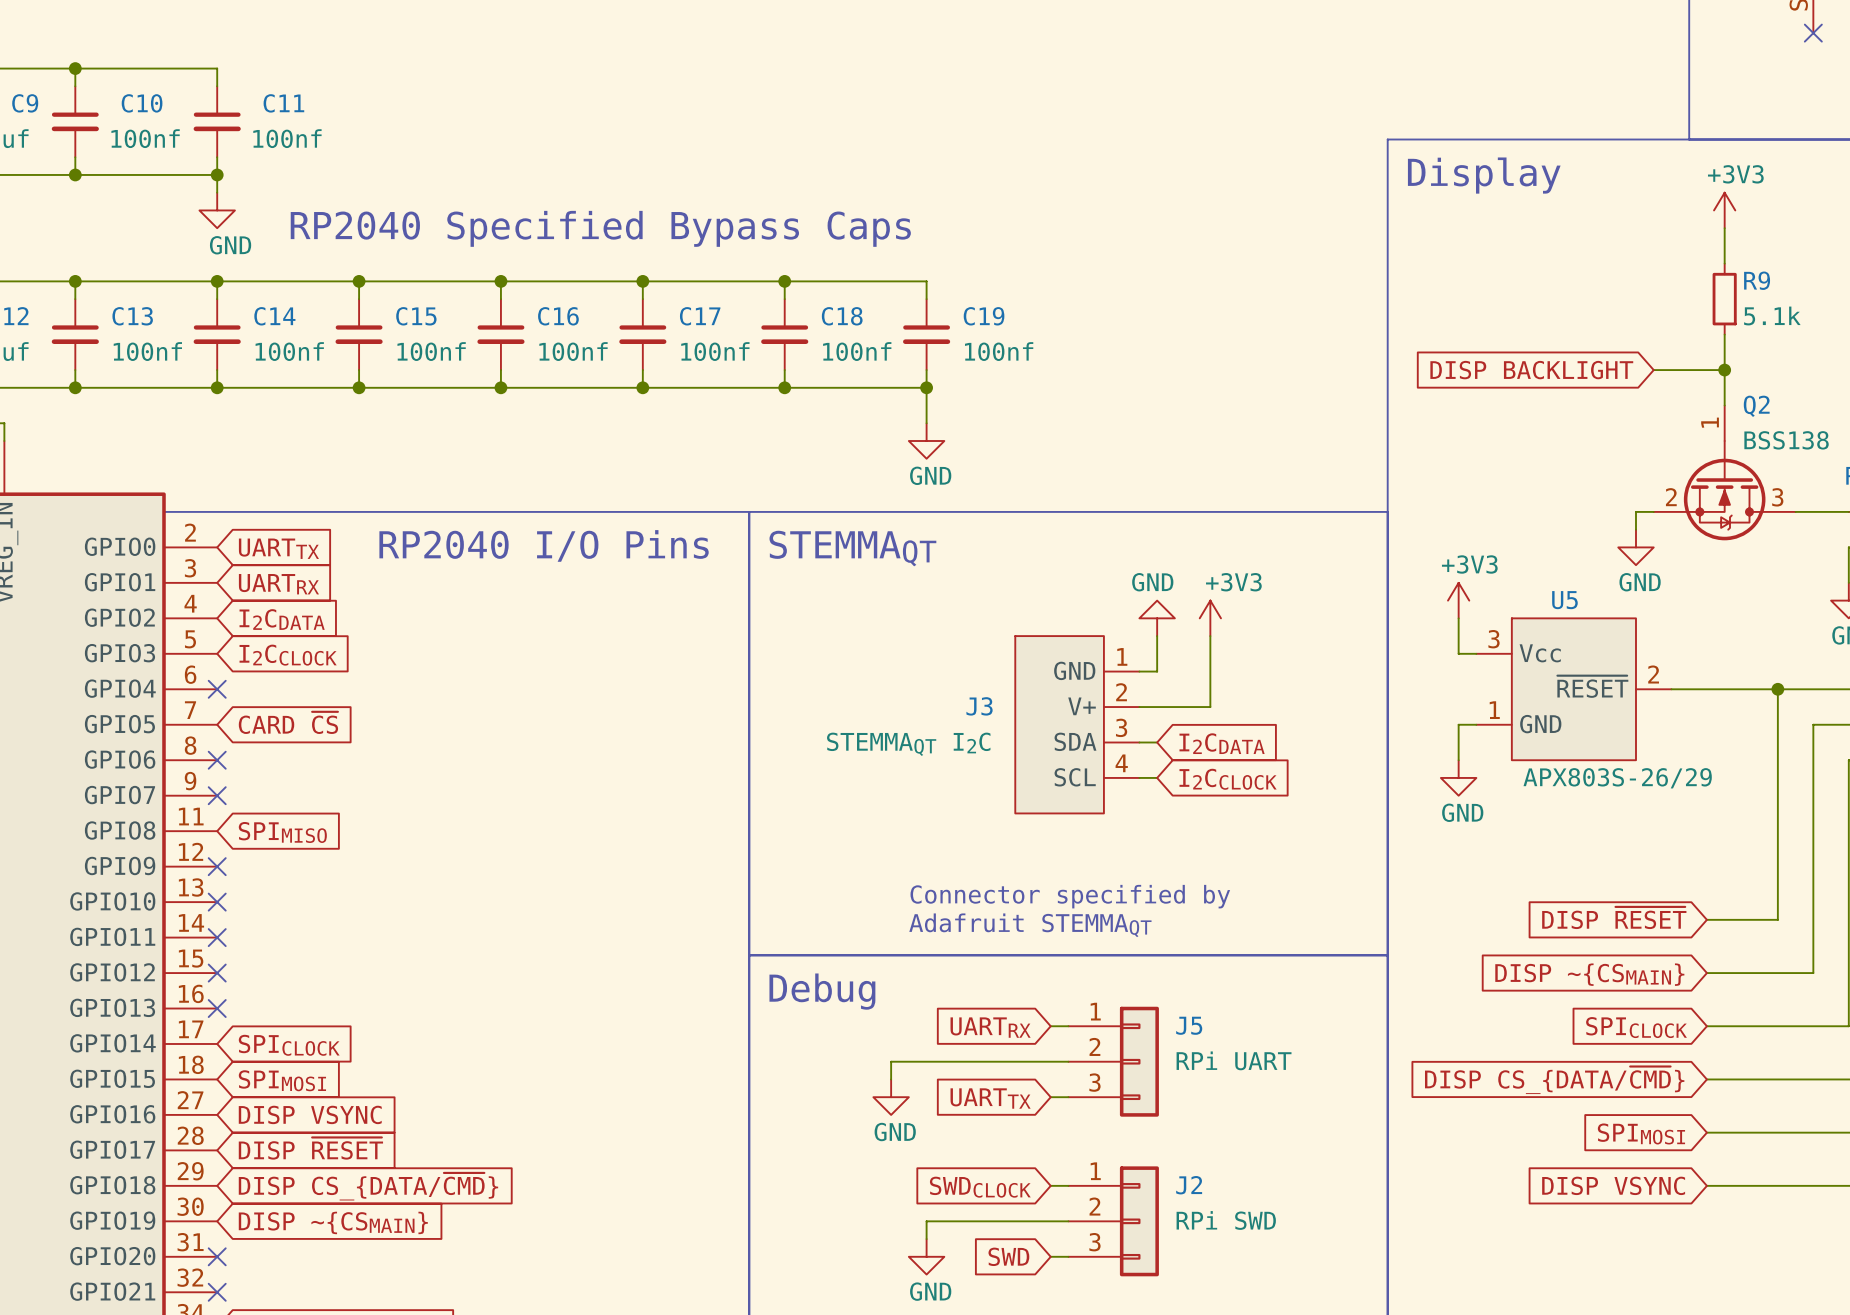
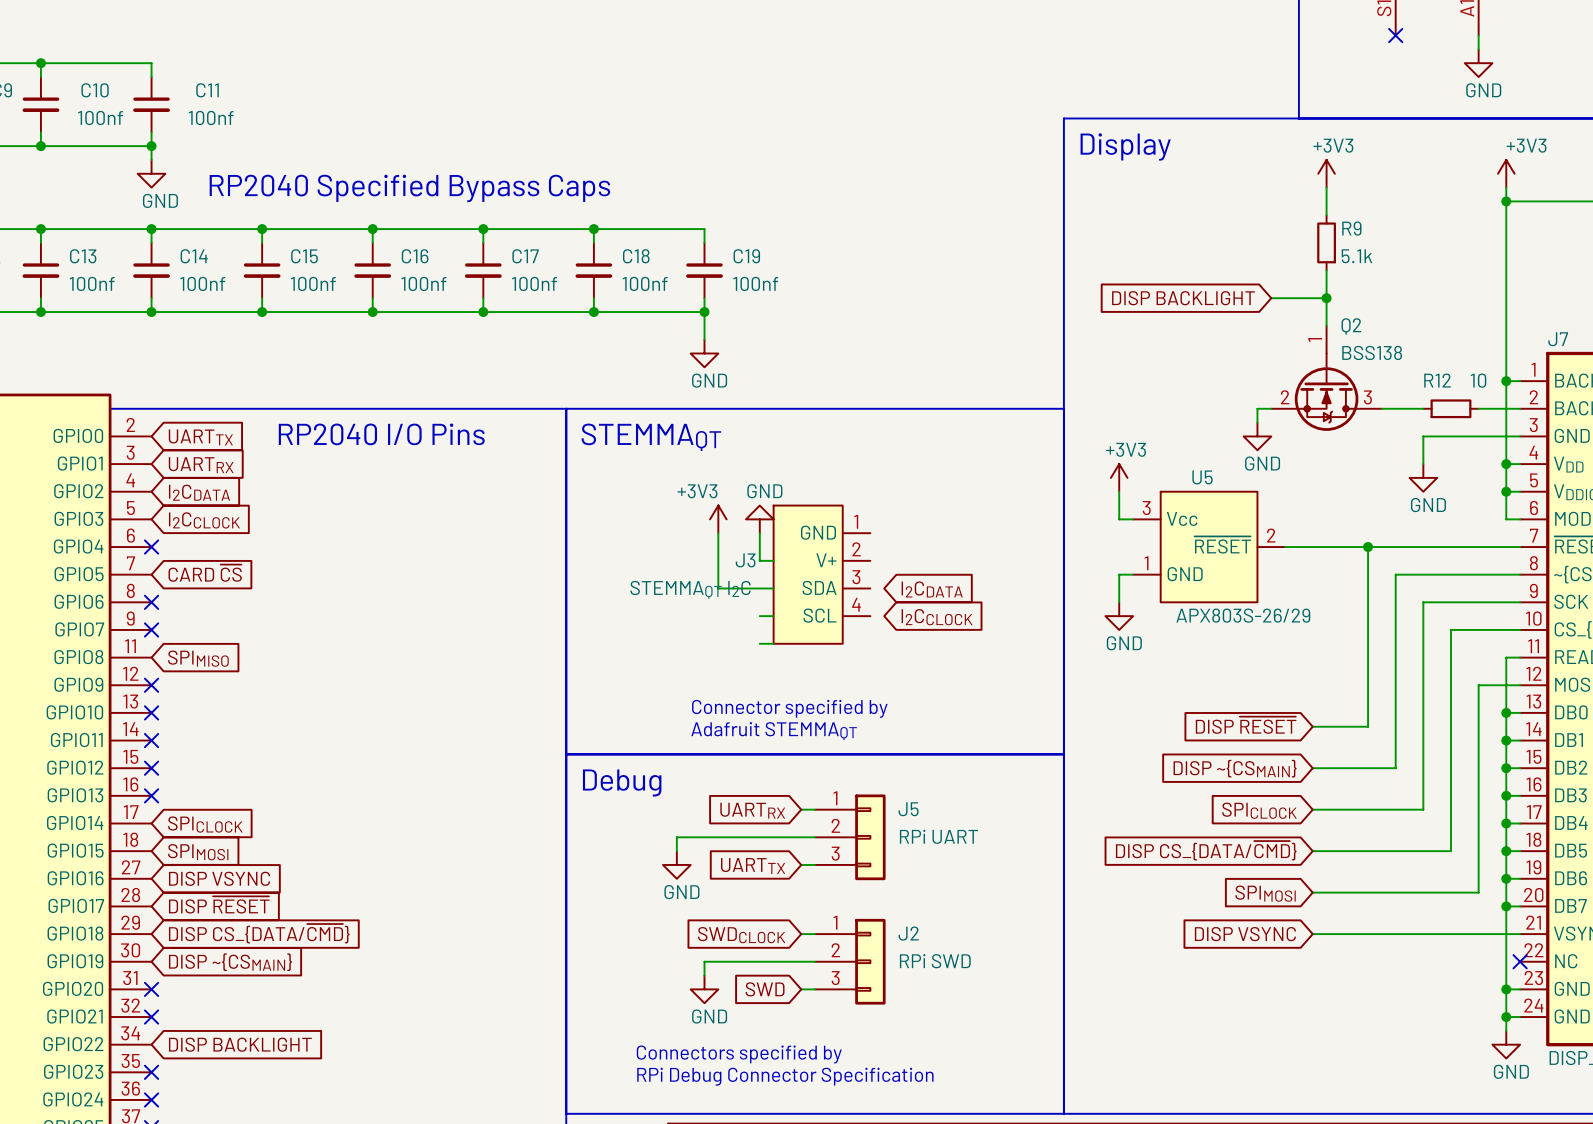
power symbol text position: GND (1152, 582) -> GND (764, 491)
power symbol text position: +3V3 (1233, 582) -> +3V3 (697, 491)
power symbol position: GND (1157, 618) -> GND (759, 519)
power symbol position: +3V3 (1210, 618) -> +3V3 (718, 519)
wire: (1157, 636) (1157, 671) (1139, 671) -> none
wire: (1210, 636) (1210, 707) (1139, 707) -> none
wire: none -> (718, 533) (718, 588) (773, 588)
wire: none -> (759, 533) (759, 560) (773, 560)
wire: (1139, 742) (1157, 742) -> (759, 616) (773, 616)
wire: (1139, 777) (1157, 777) -> (759, 643) (773, 643)

